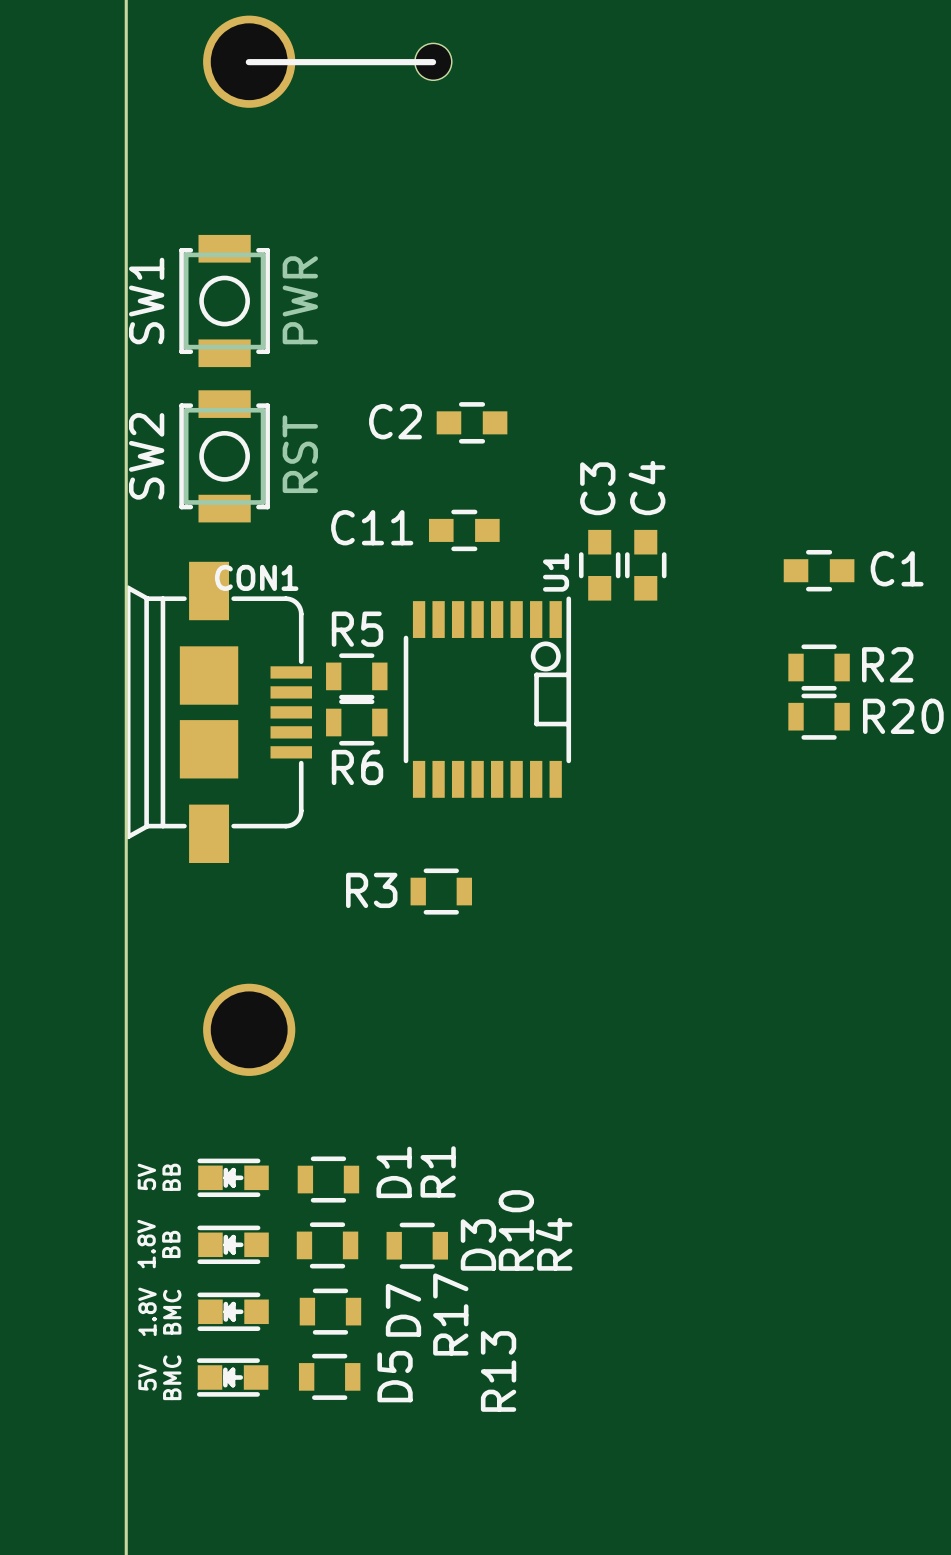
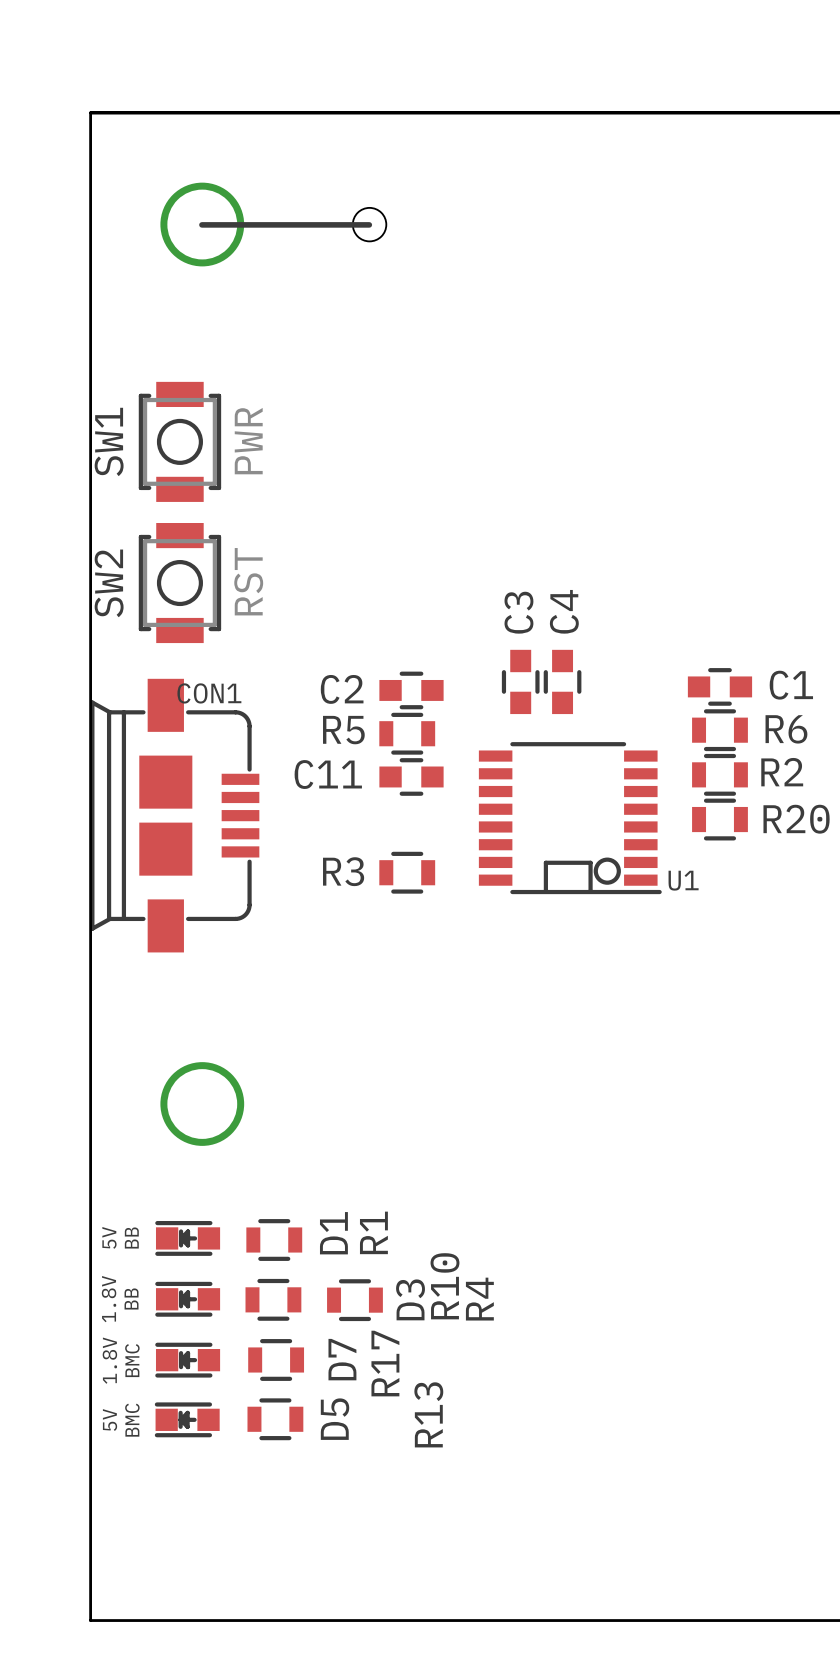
C2 position: (472, 422) -> (411, 690)
C11 position: (464, 530) -> (411, 776)
R5 name position: R5 (357, 629) -> R5 (343, 730)
R5 position: (356, 676) -> (407, 733)
U1 rotation: 0° (487, 697) -> 90° clockwise (570, 818)
U1 position: (487, 697) -> (570, 818)
R6 position: (356, 722) -> (719, 730)
R6 name position: R6 (357, 767) -> R6 (786, 729)
R3 position: (441, 891) -> (407, 872)

